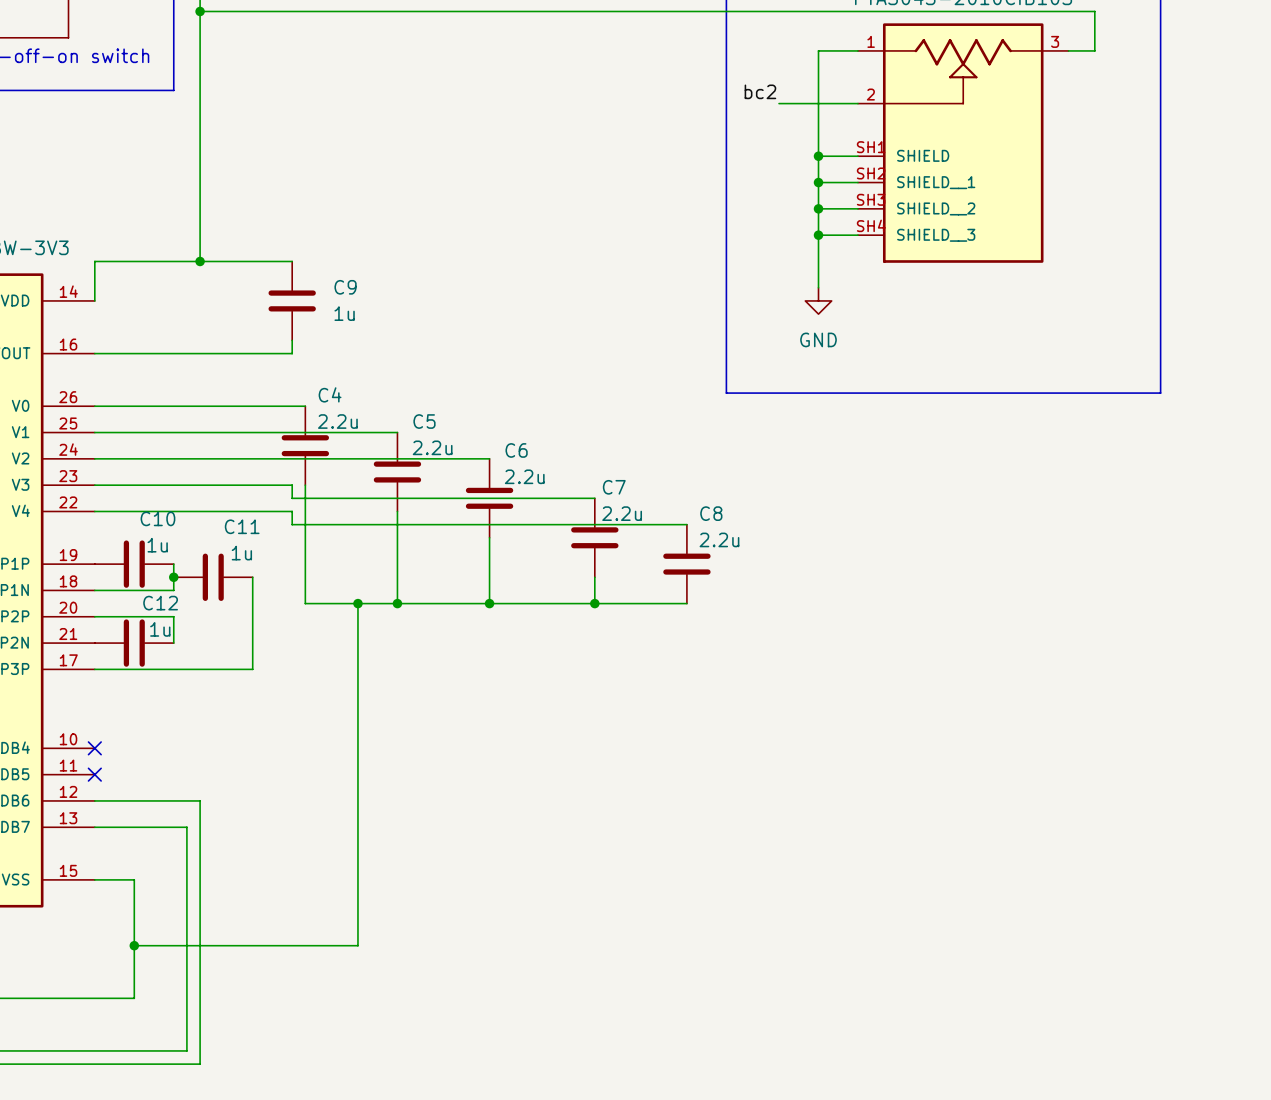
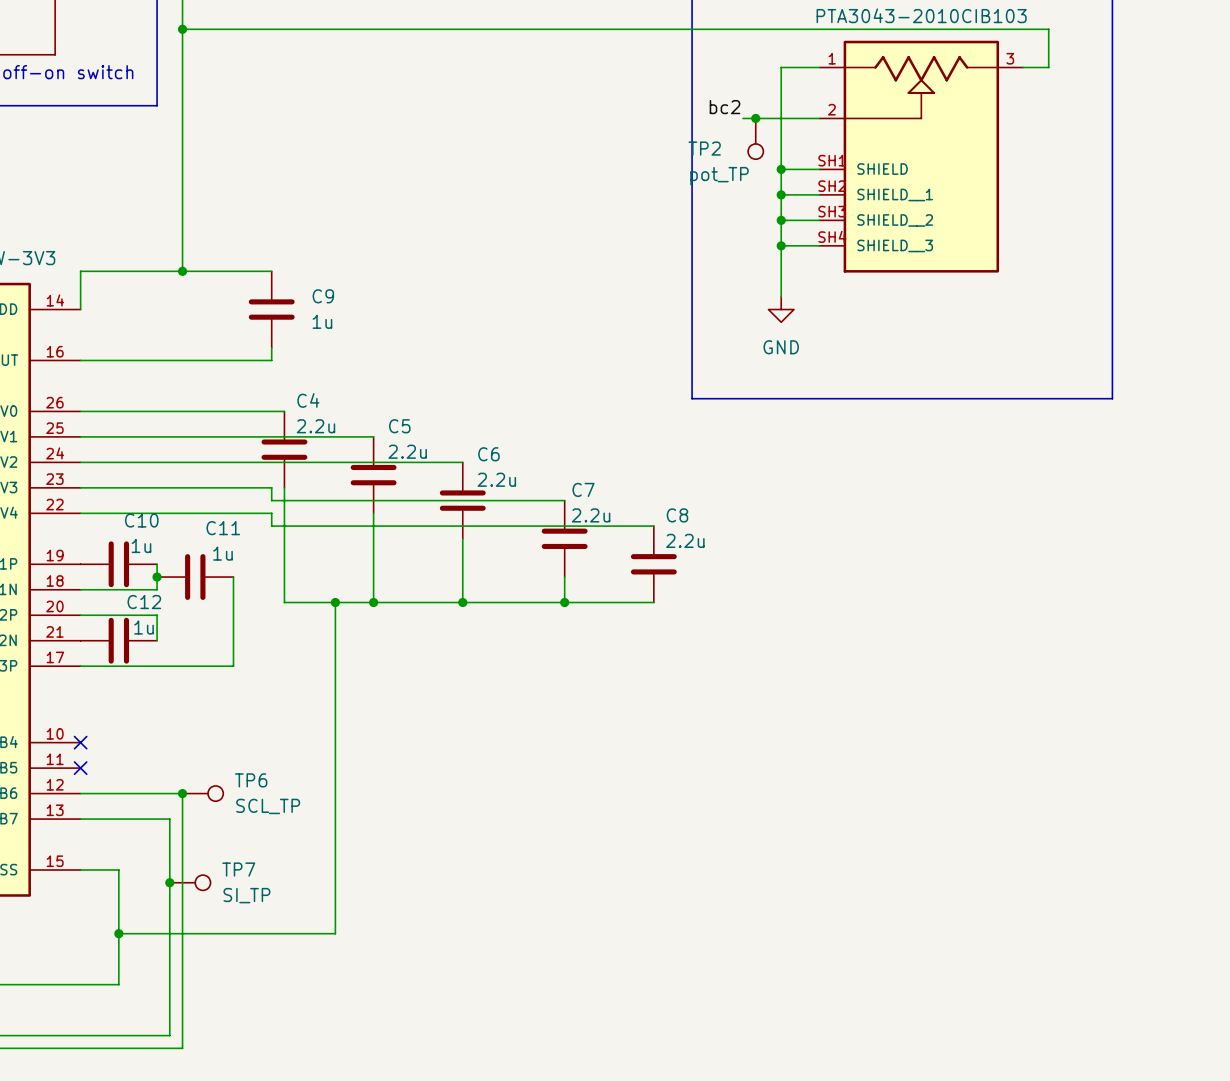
junction: none -> (755, 118)
TP2: none -> pot_TP (755, 138)
junction: none -> (182, 793)
TP6: none -> SCL_TP (202, 793)
junction: none -> (169, 882)
TP7: none -> SI_TP (190, 882)

